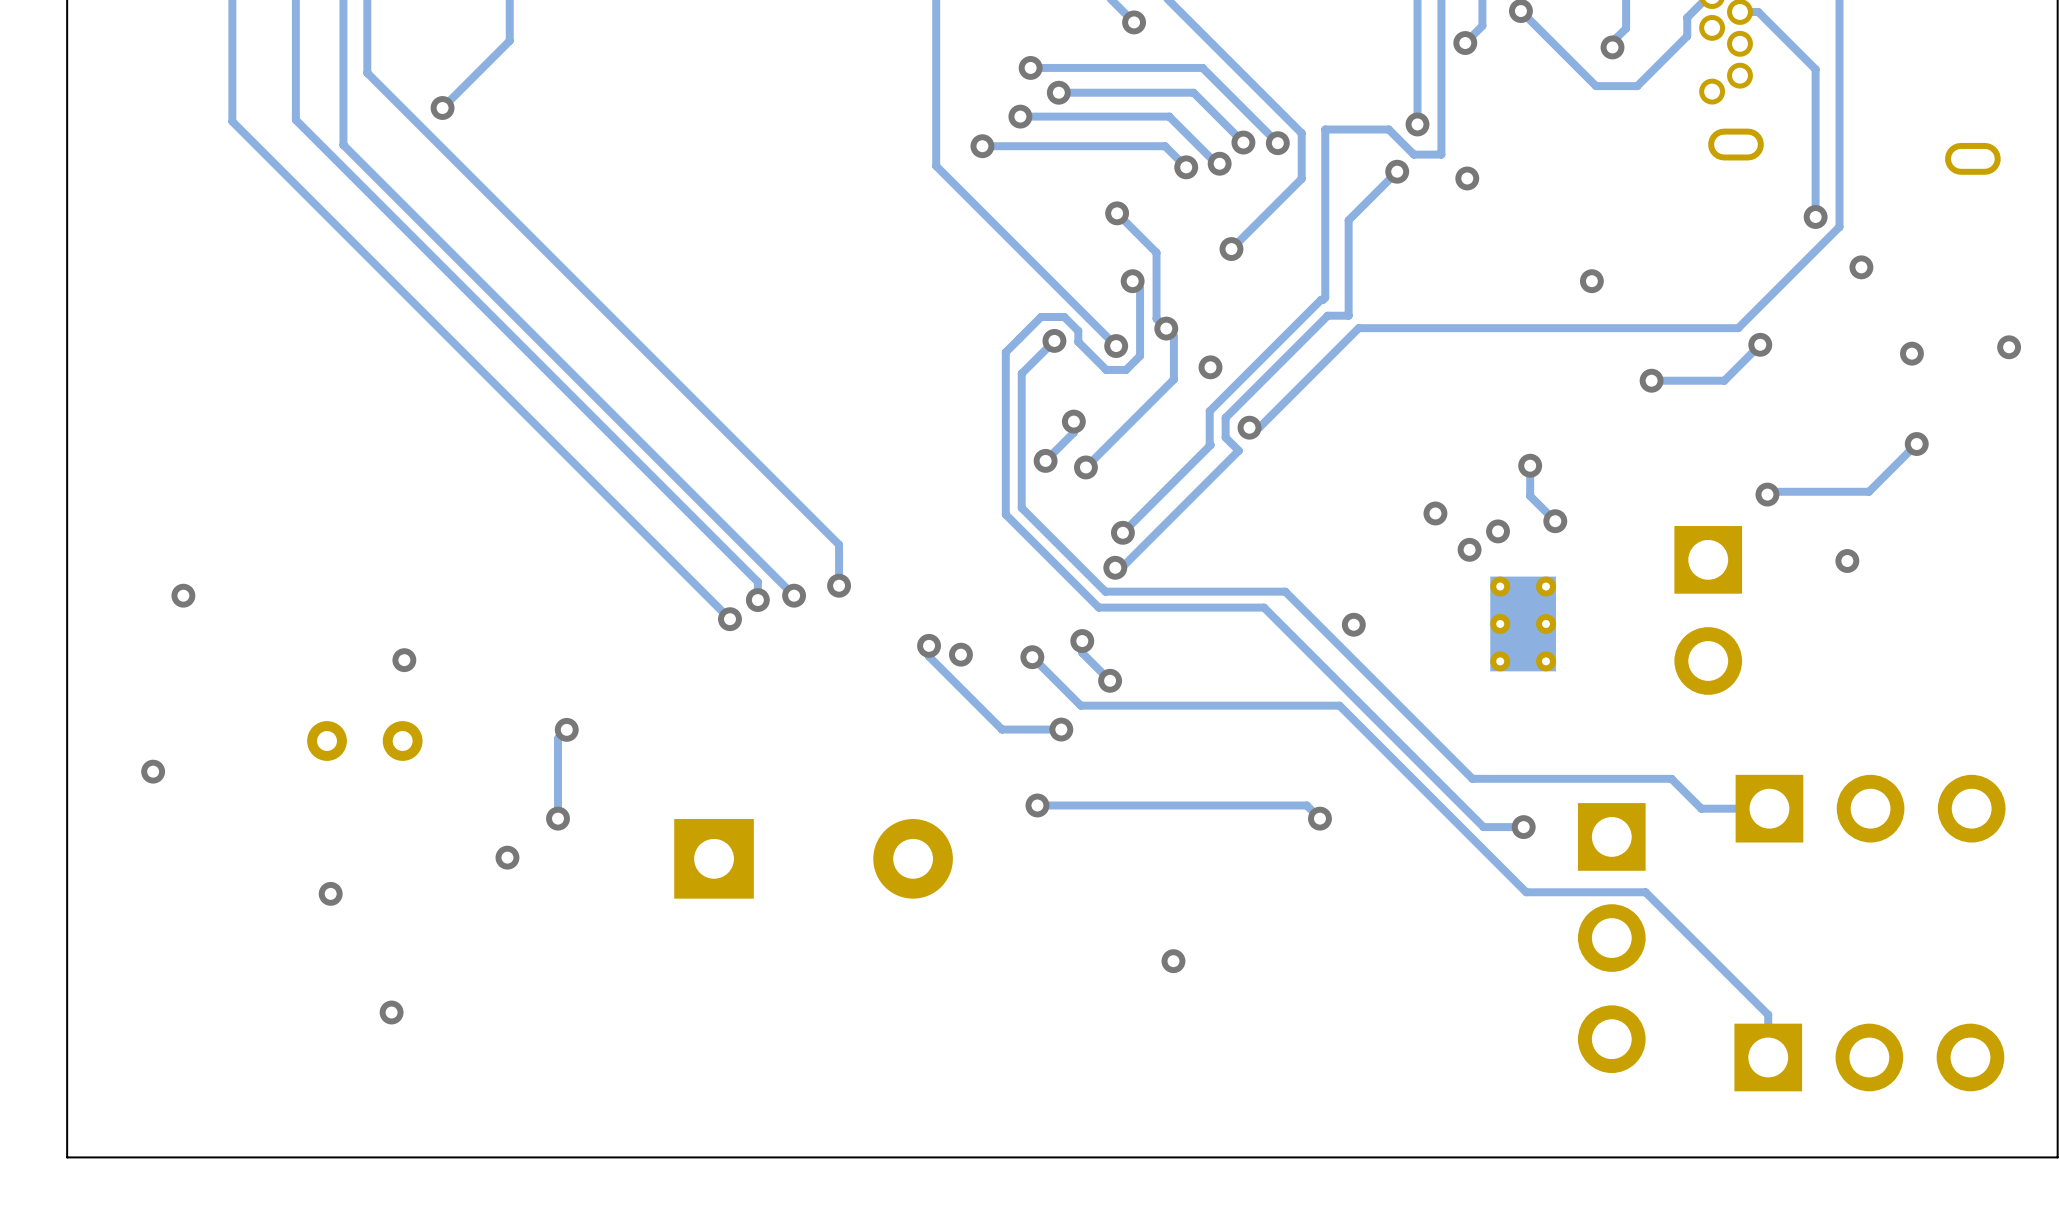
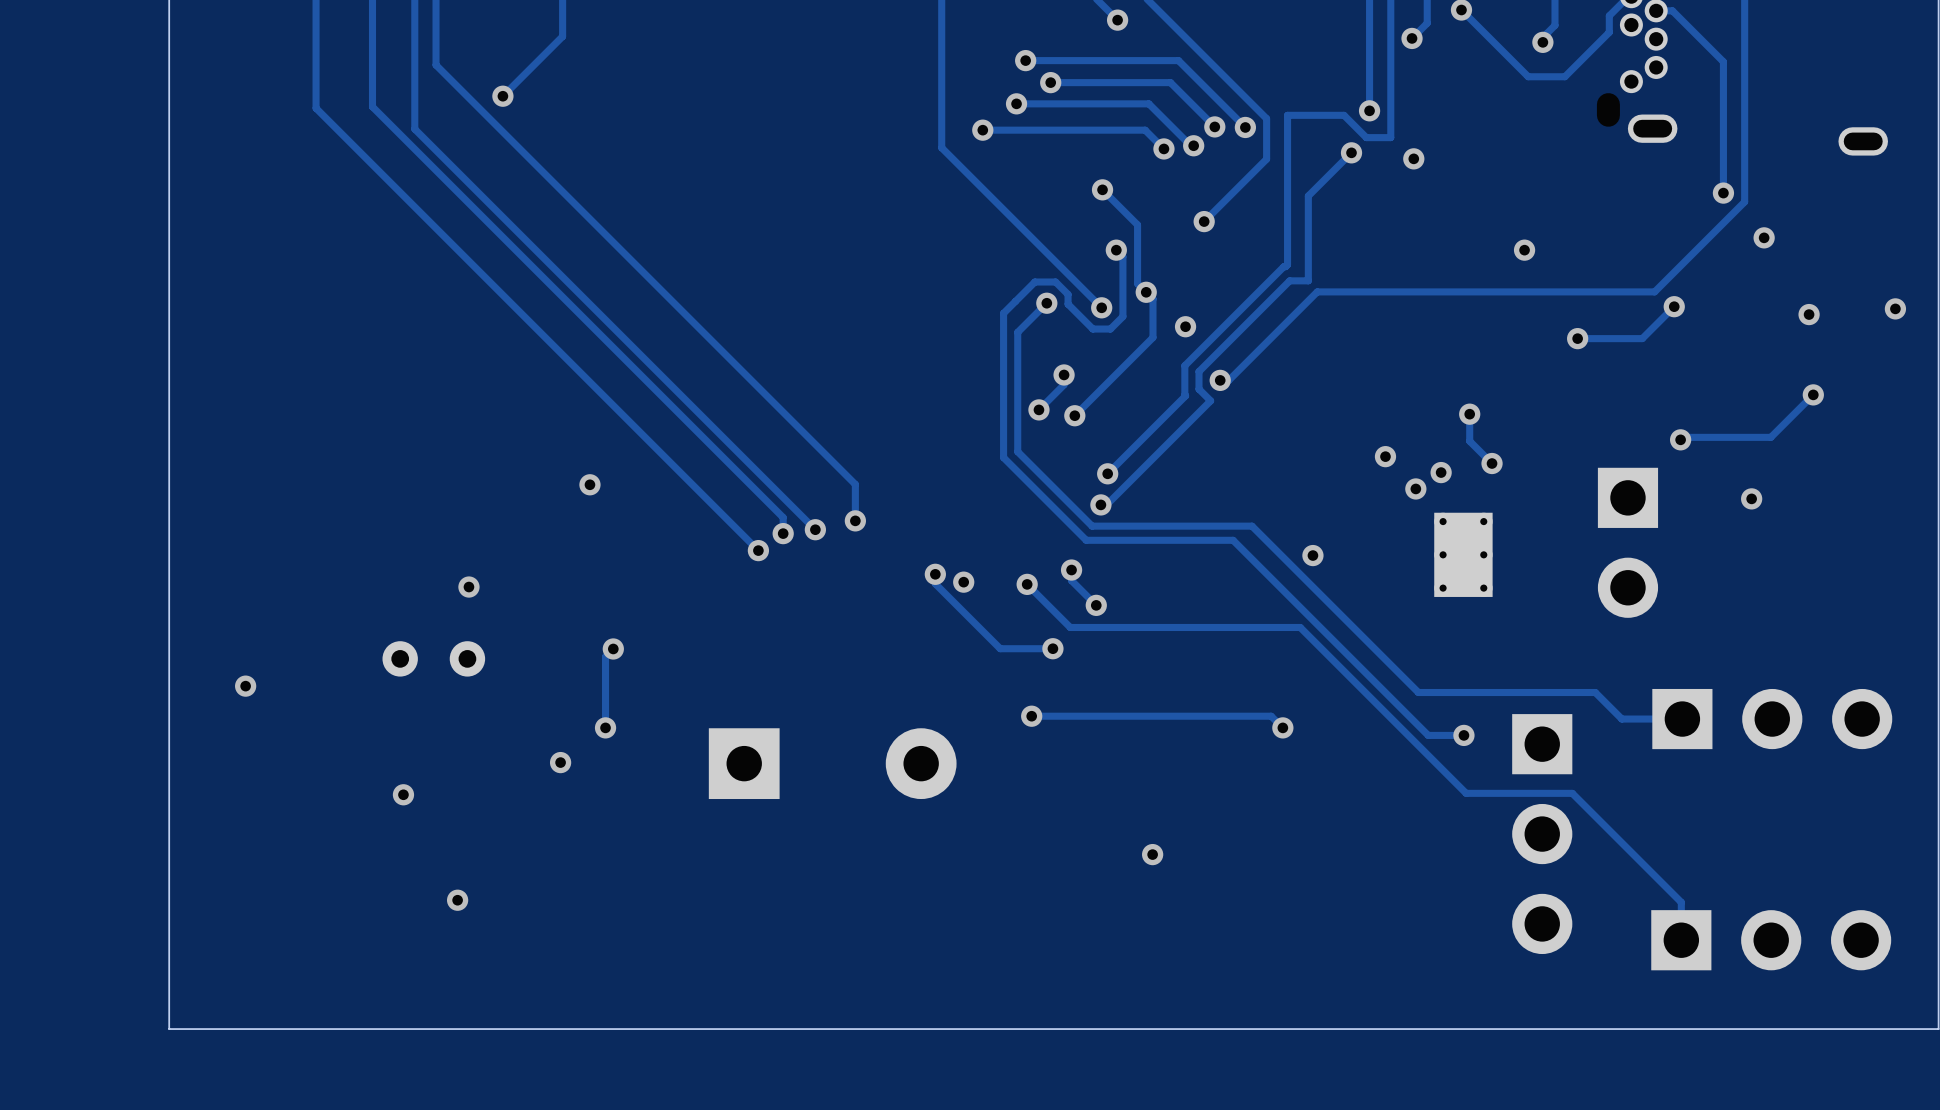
via: none -> (589, 484)
via: (183, 595) -> none

